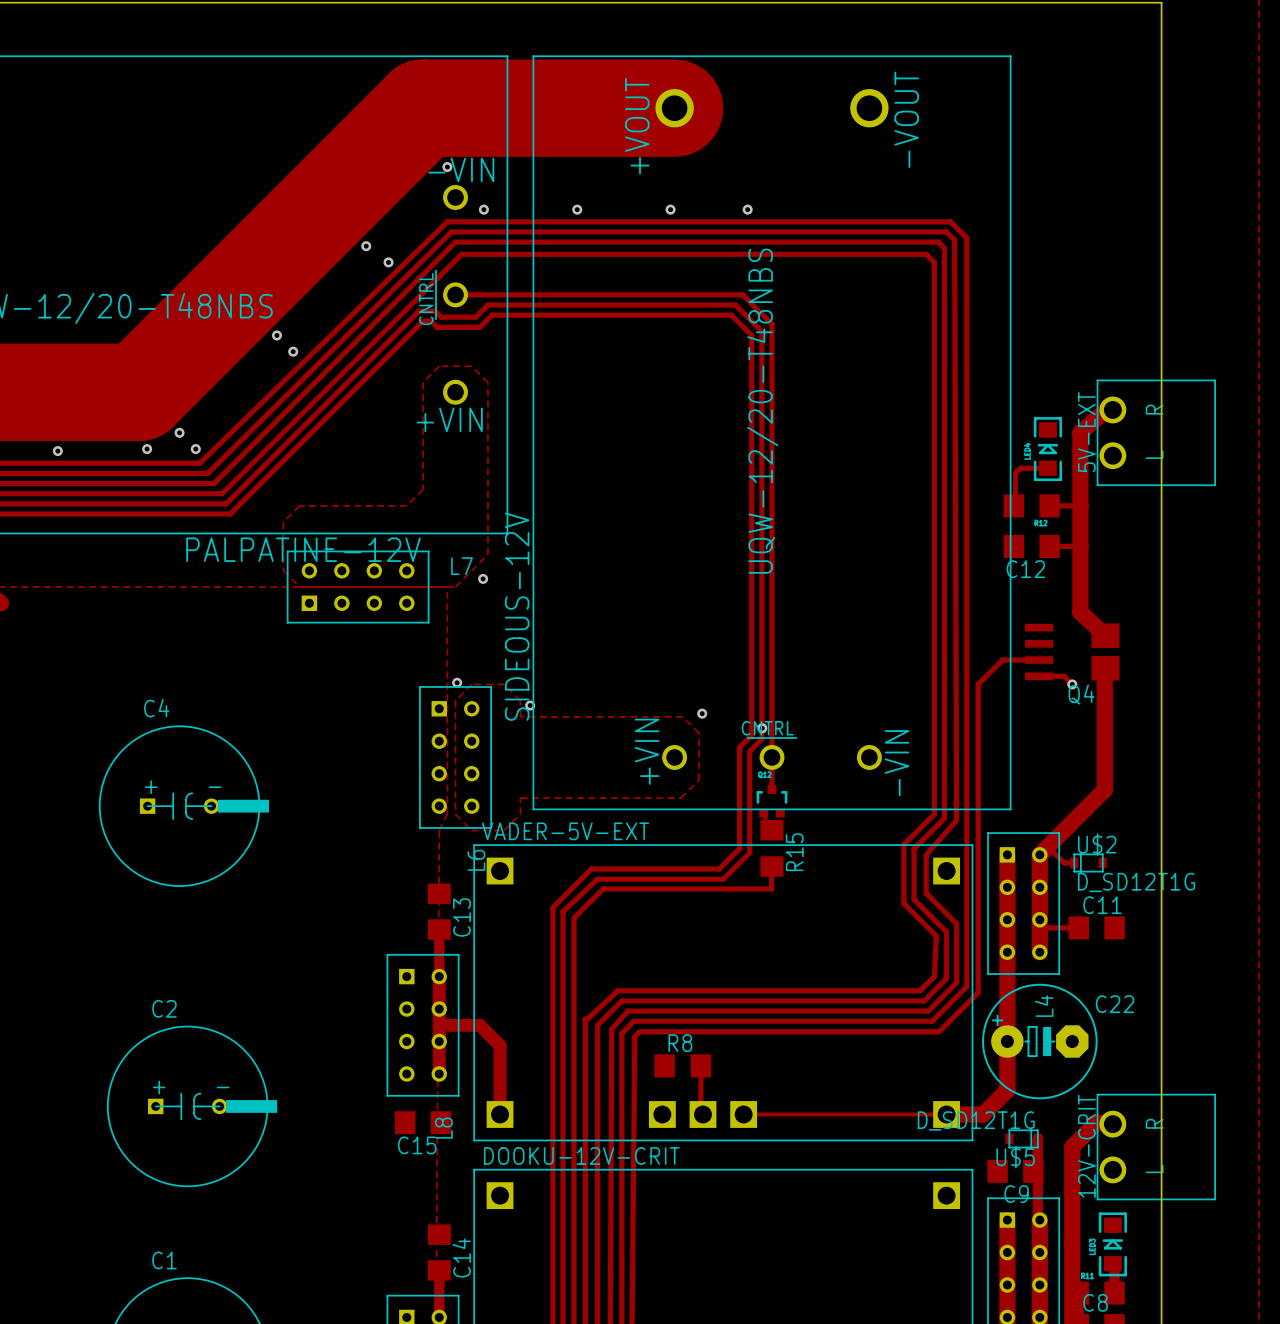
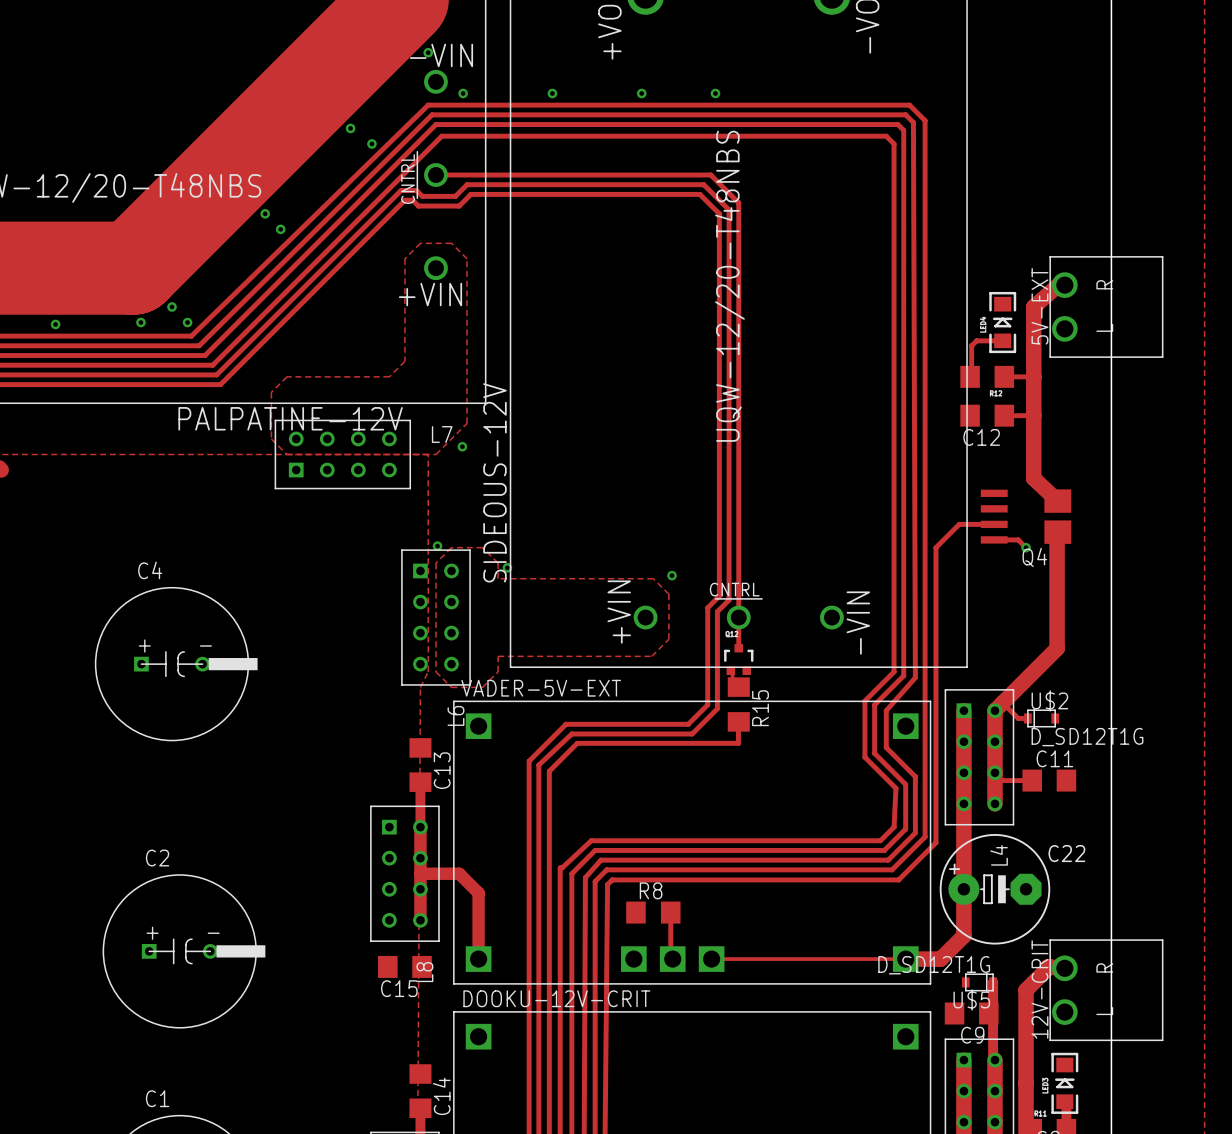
via: (762, 728) -> none

